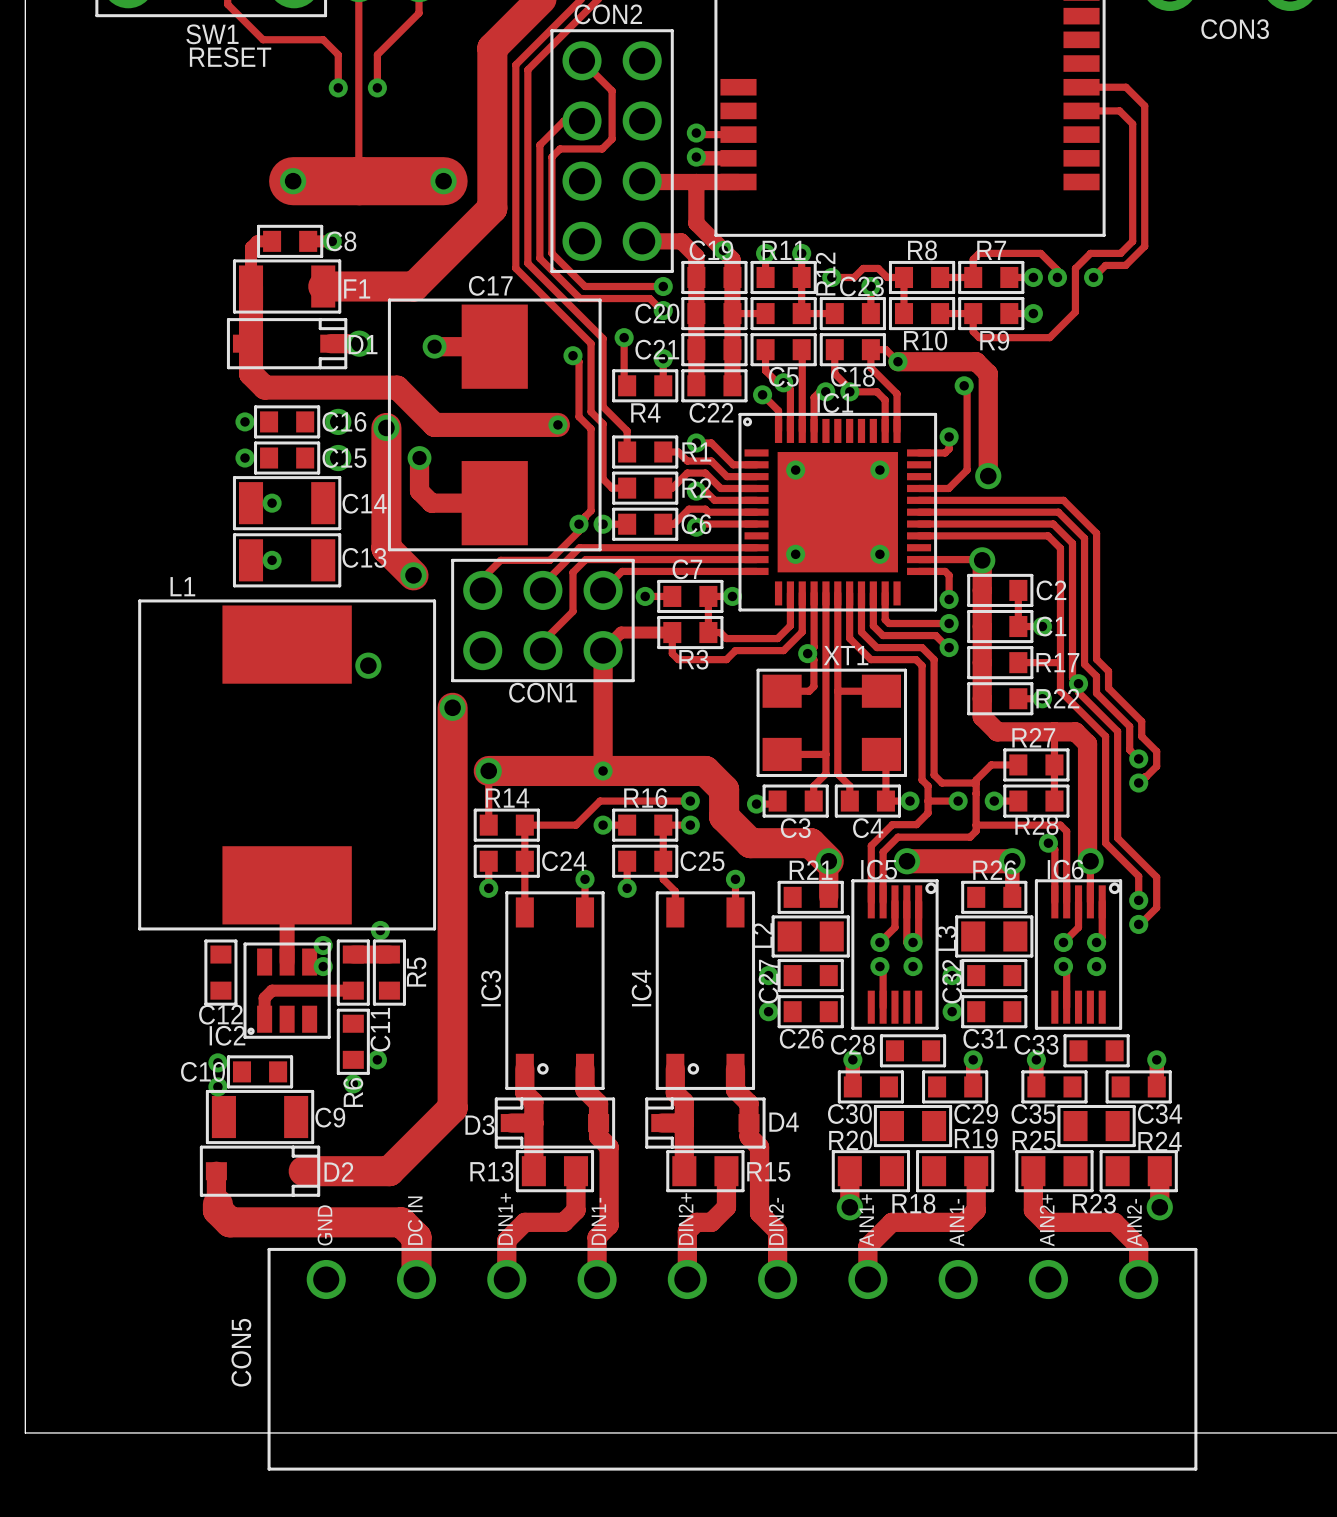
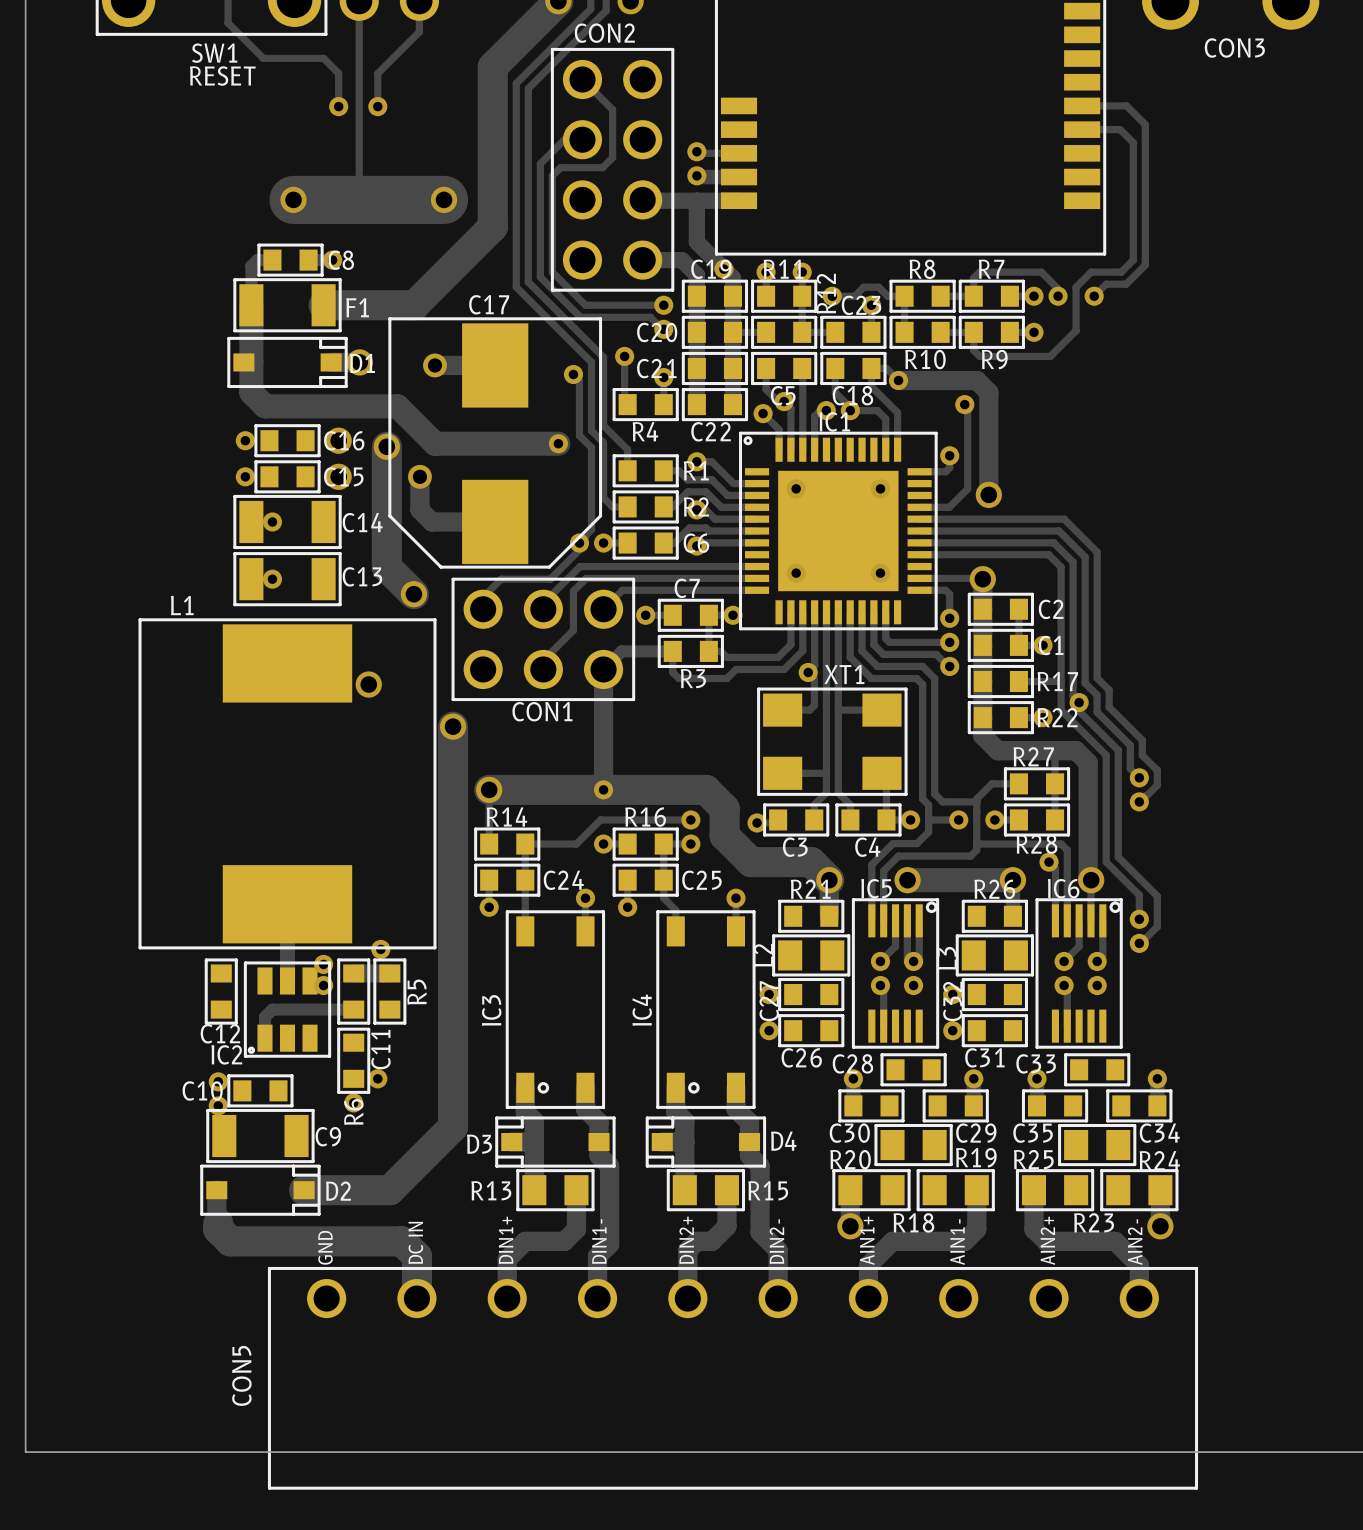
C17 footprint: [387, 298, 602, 552] -> [388, 317, 603, 569]

